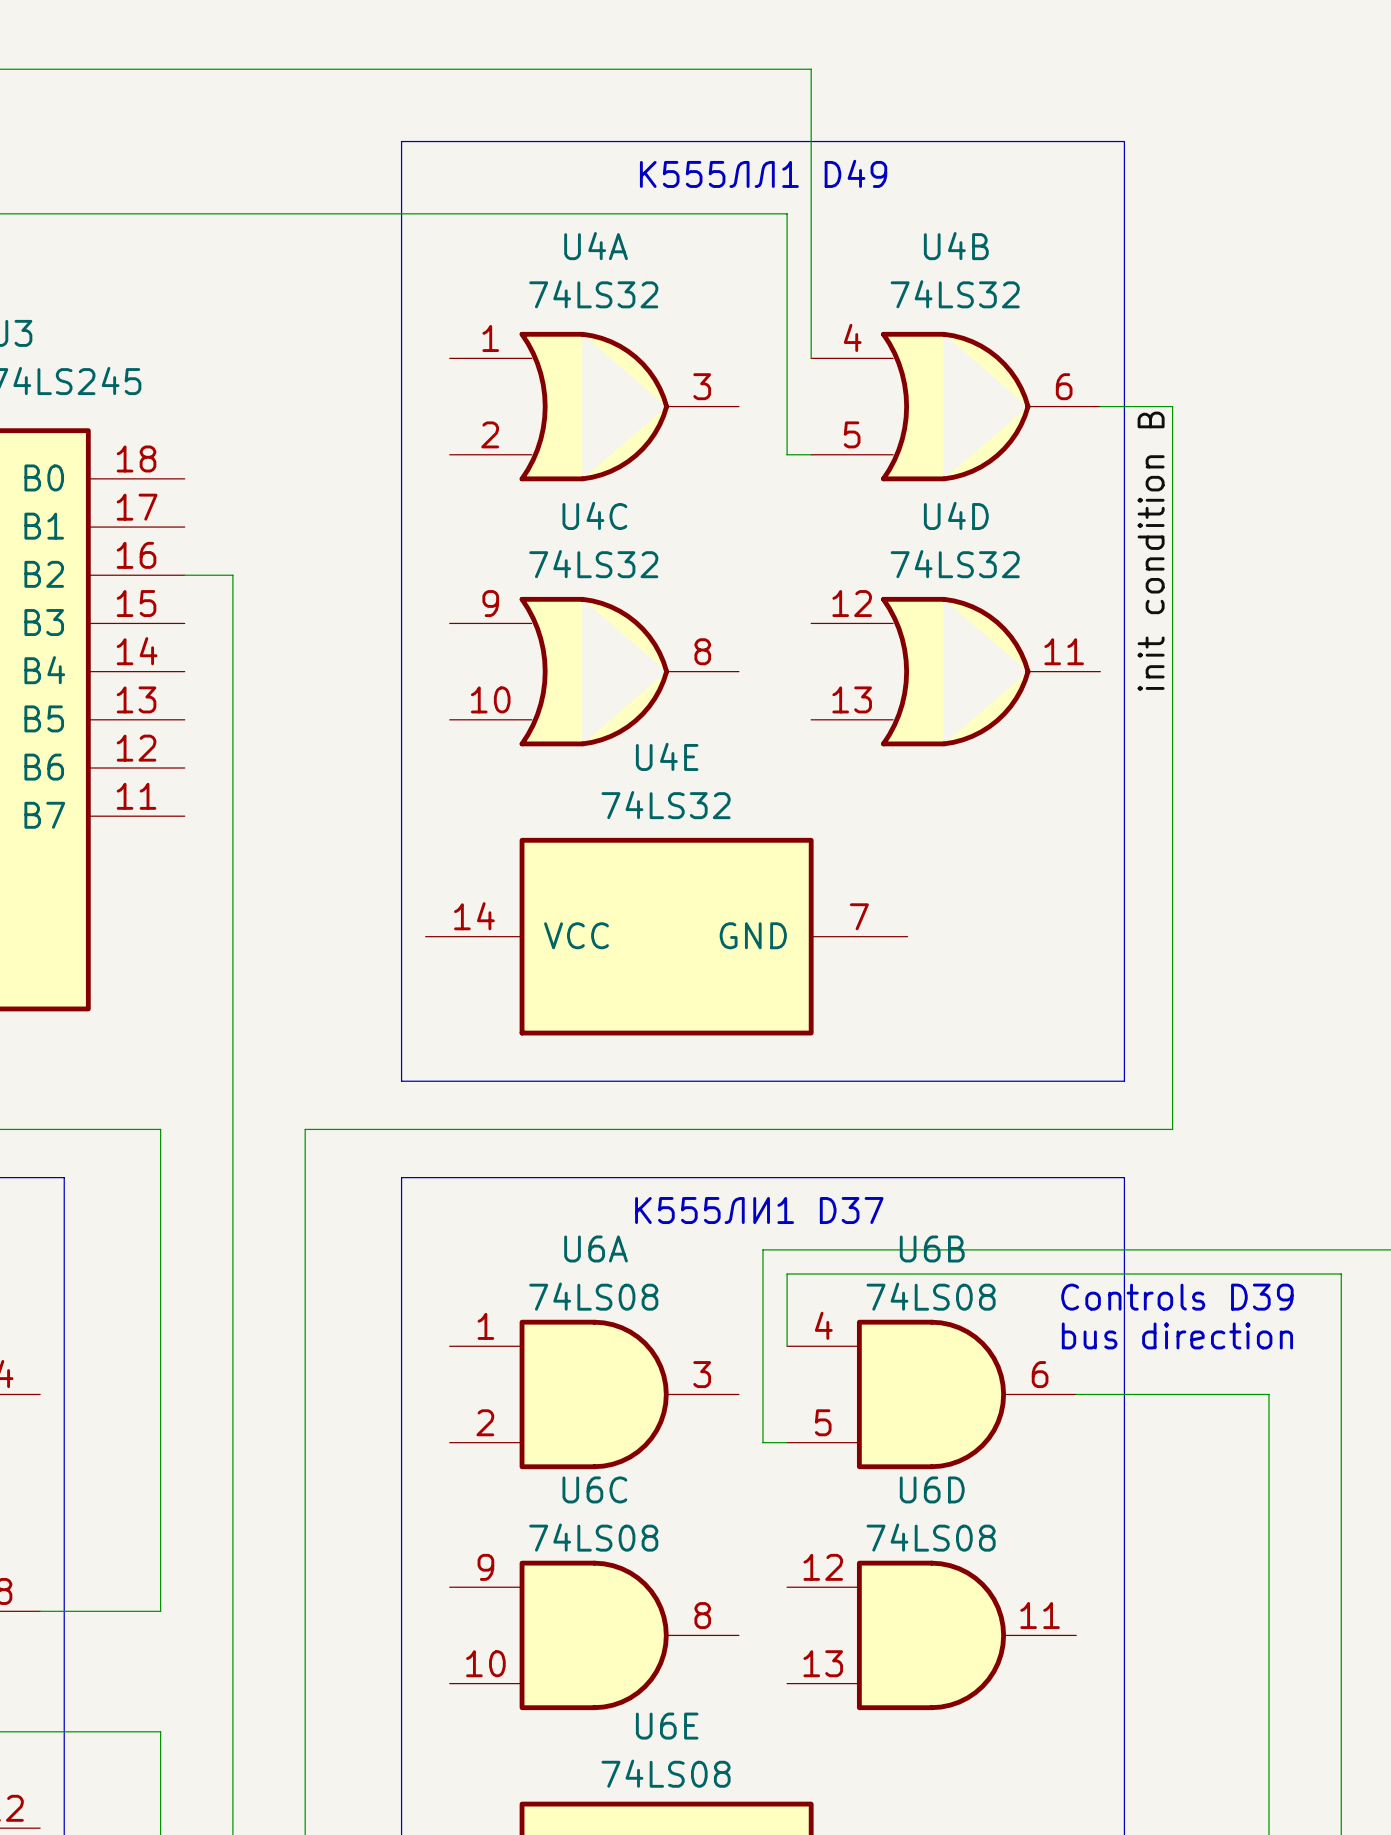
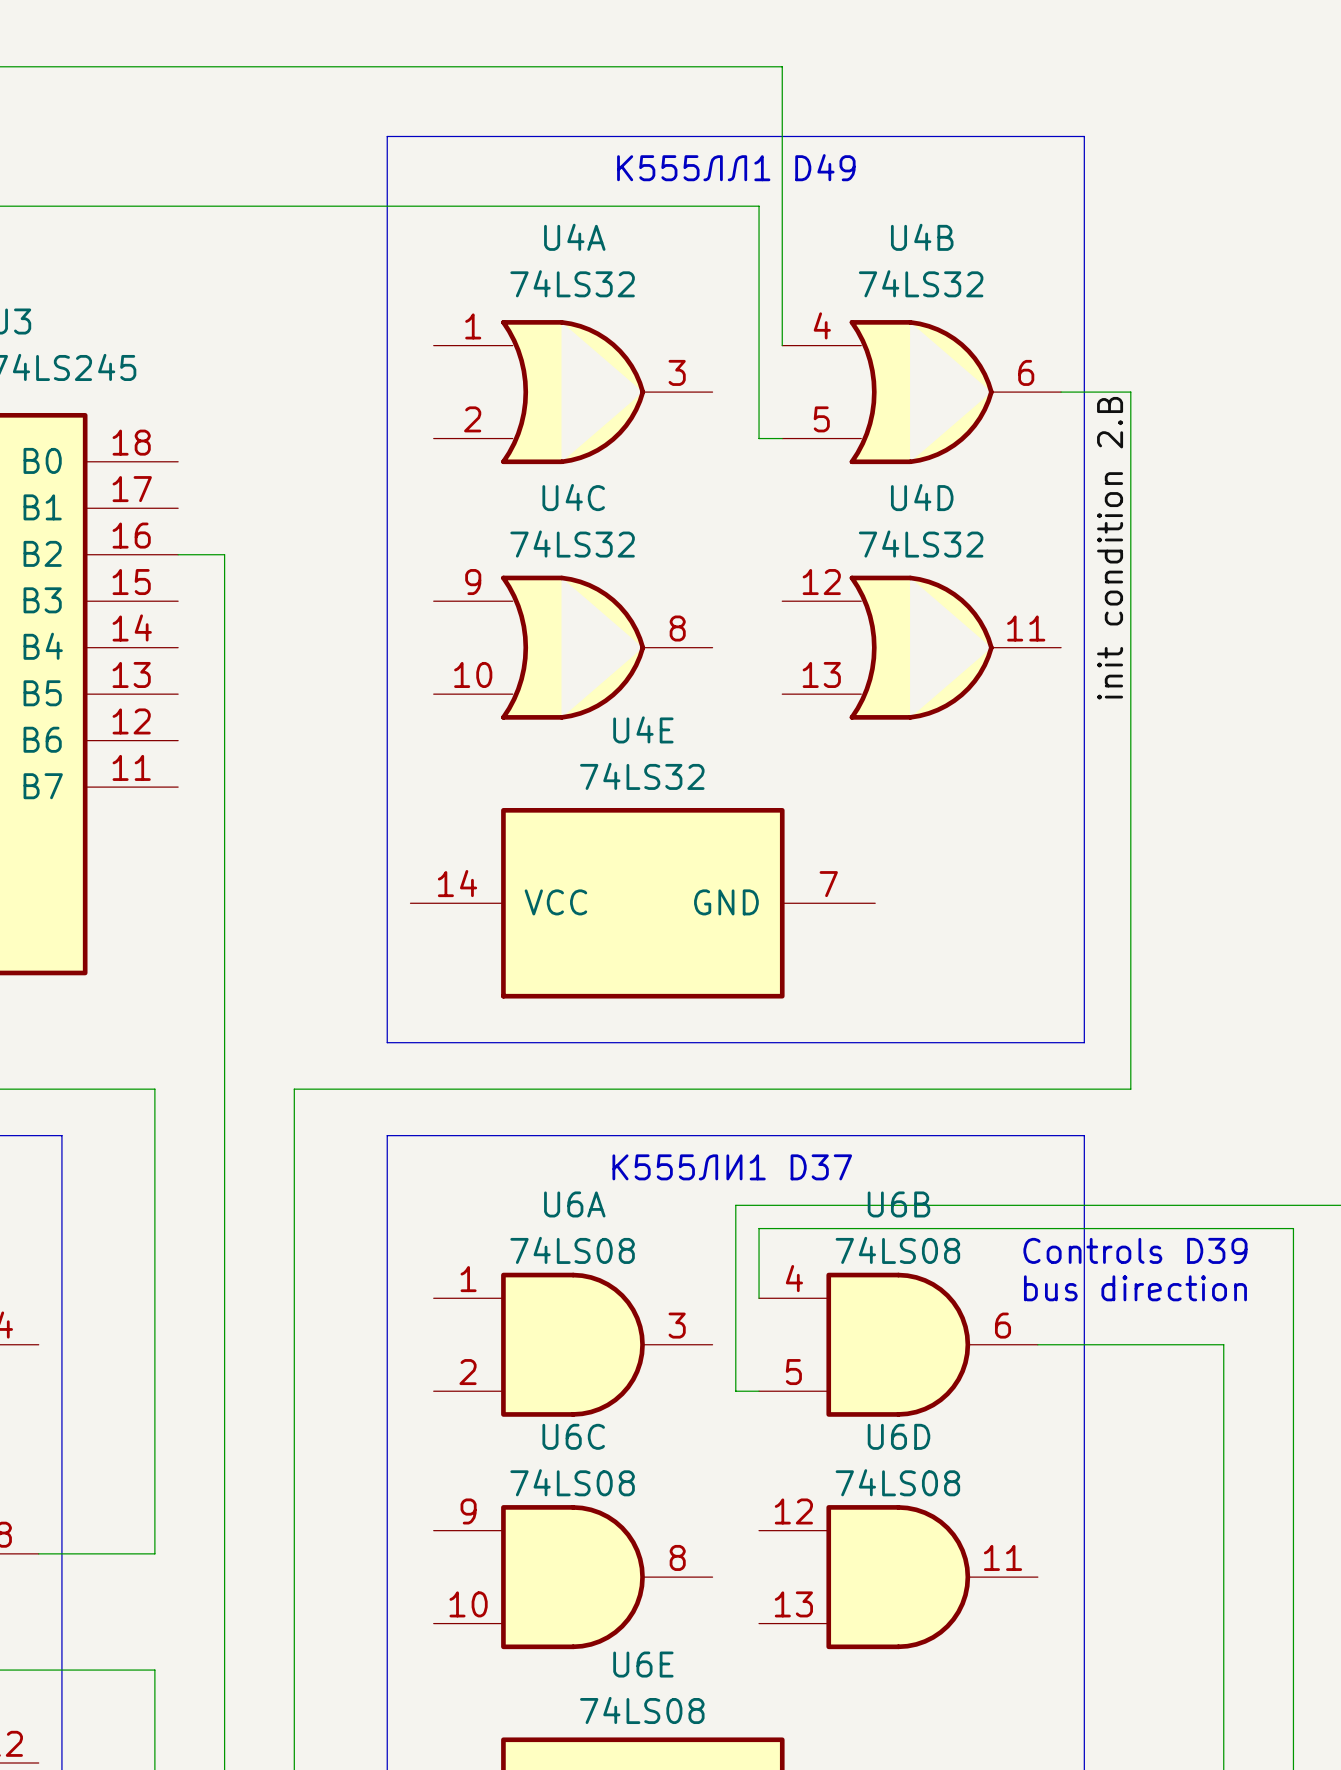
label: init condition B (1151, 551) -> init condition 2.B (1110, 548)

